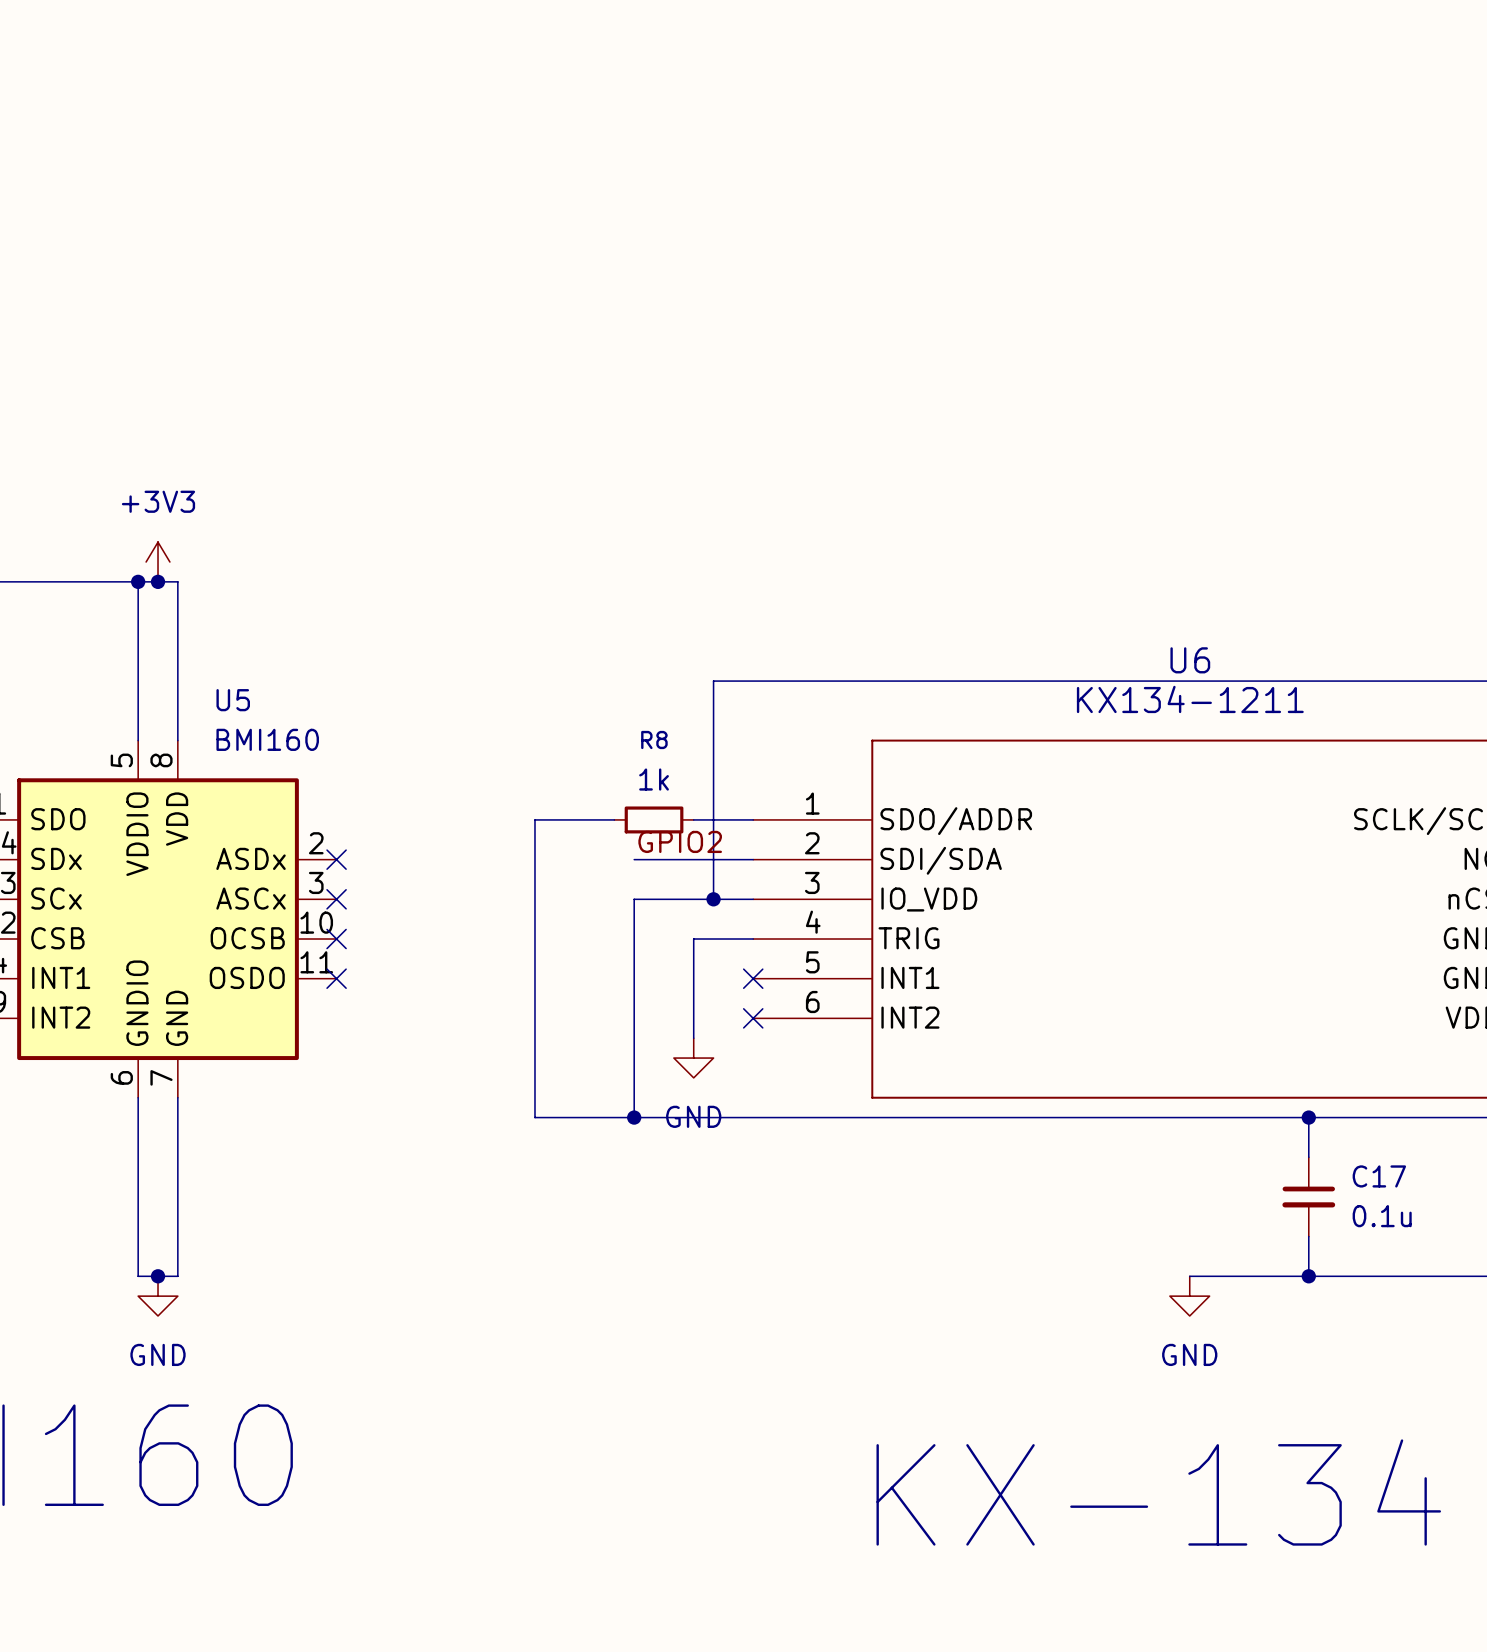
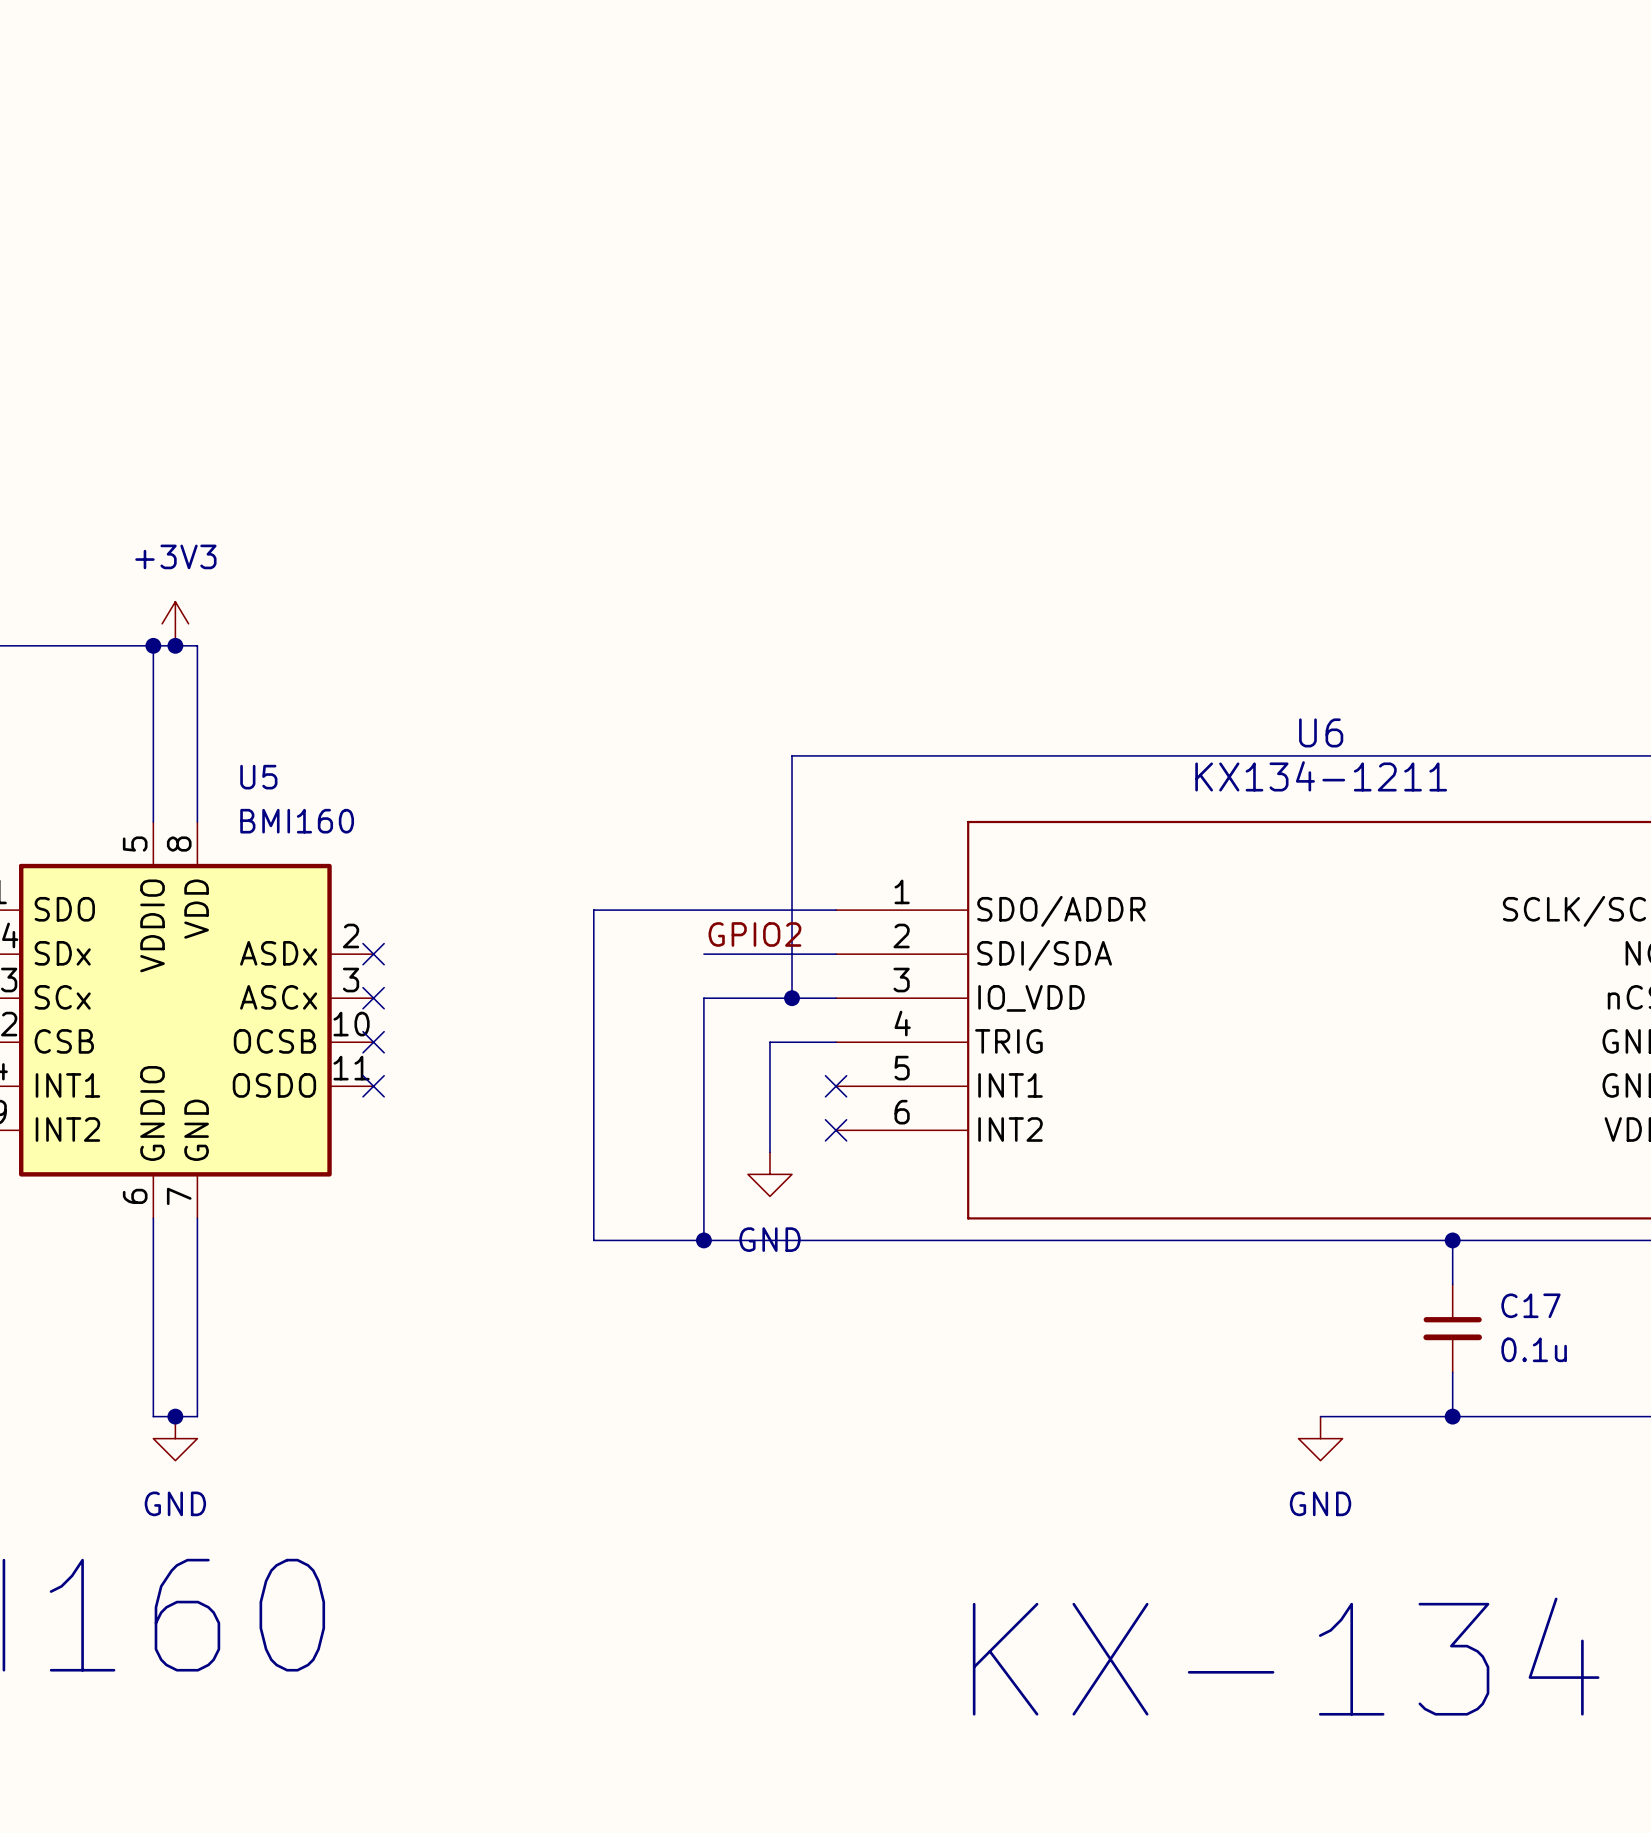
wire: none -> (681, 910) (769, 910)
R8: 1k (654, 819) -> none

